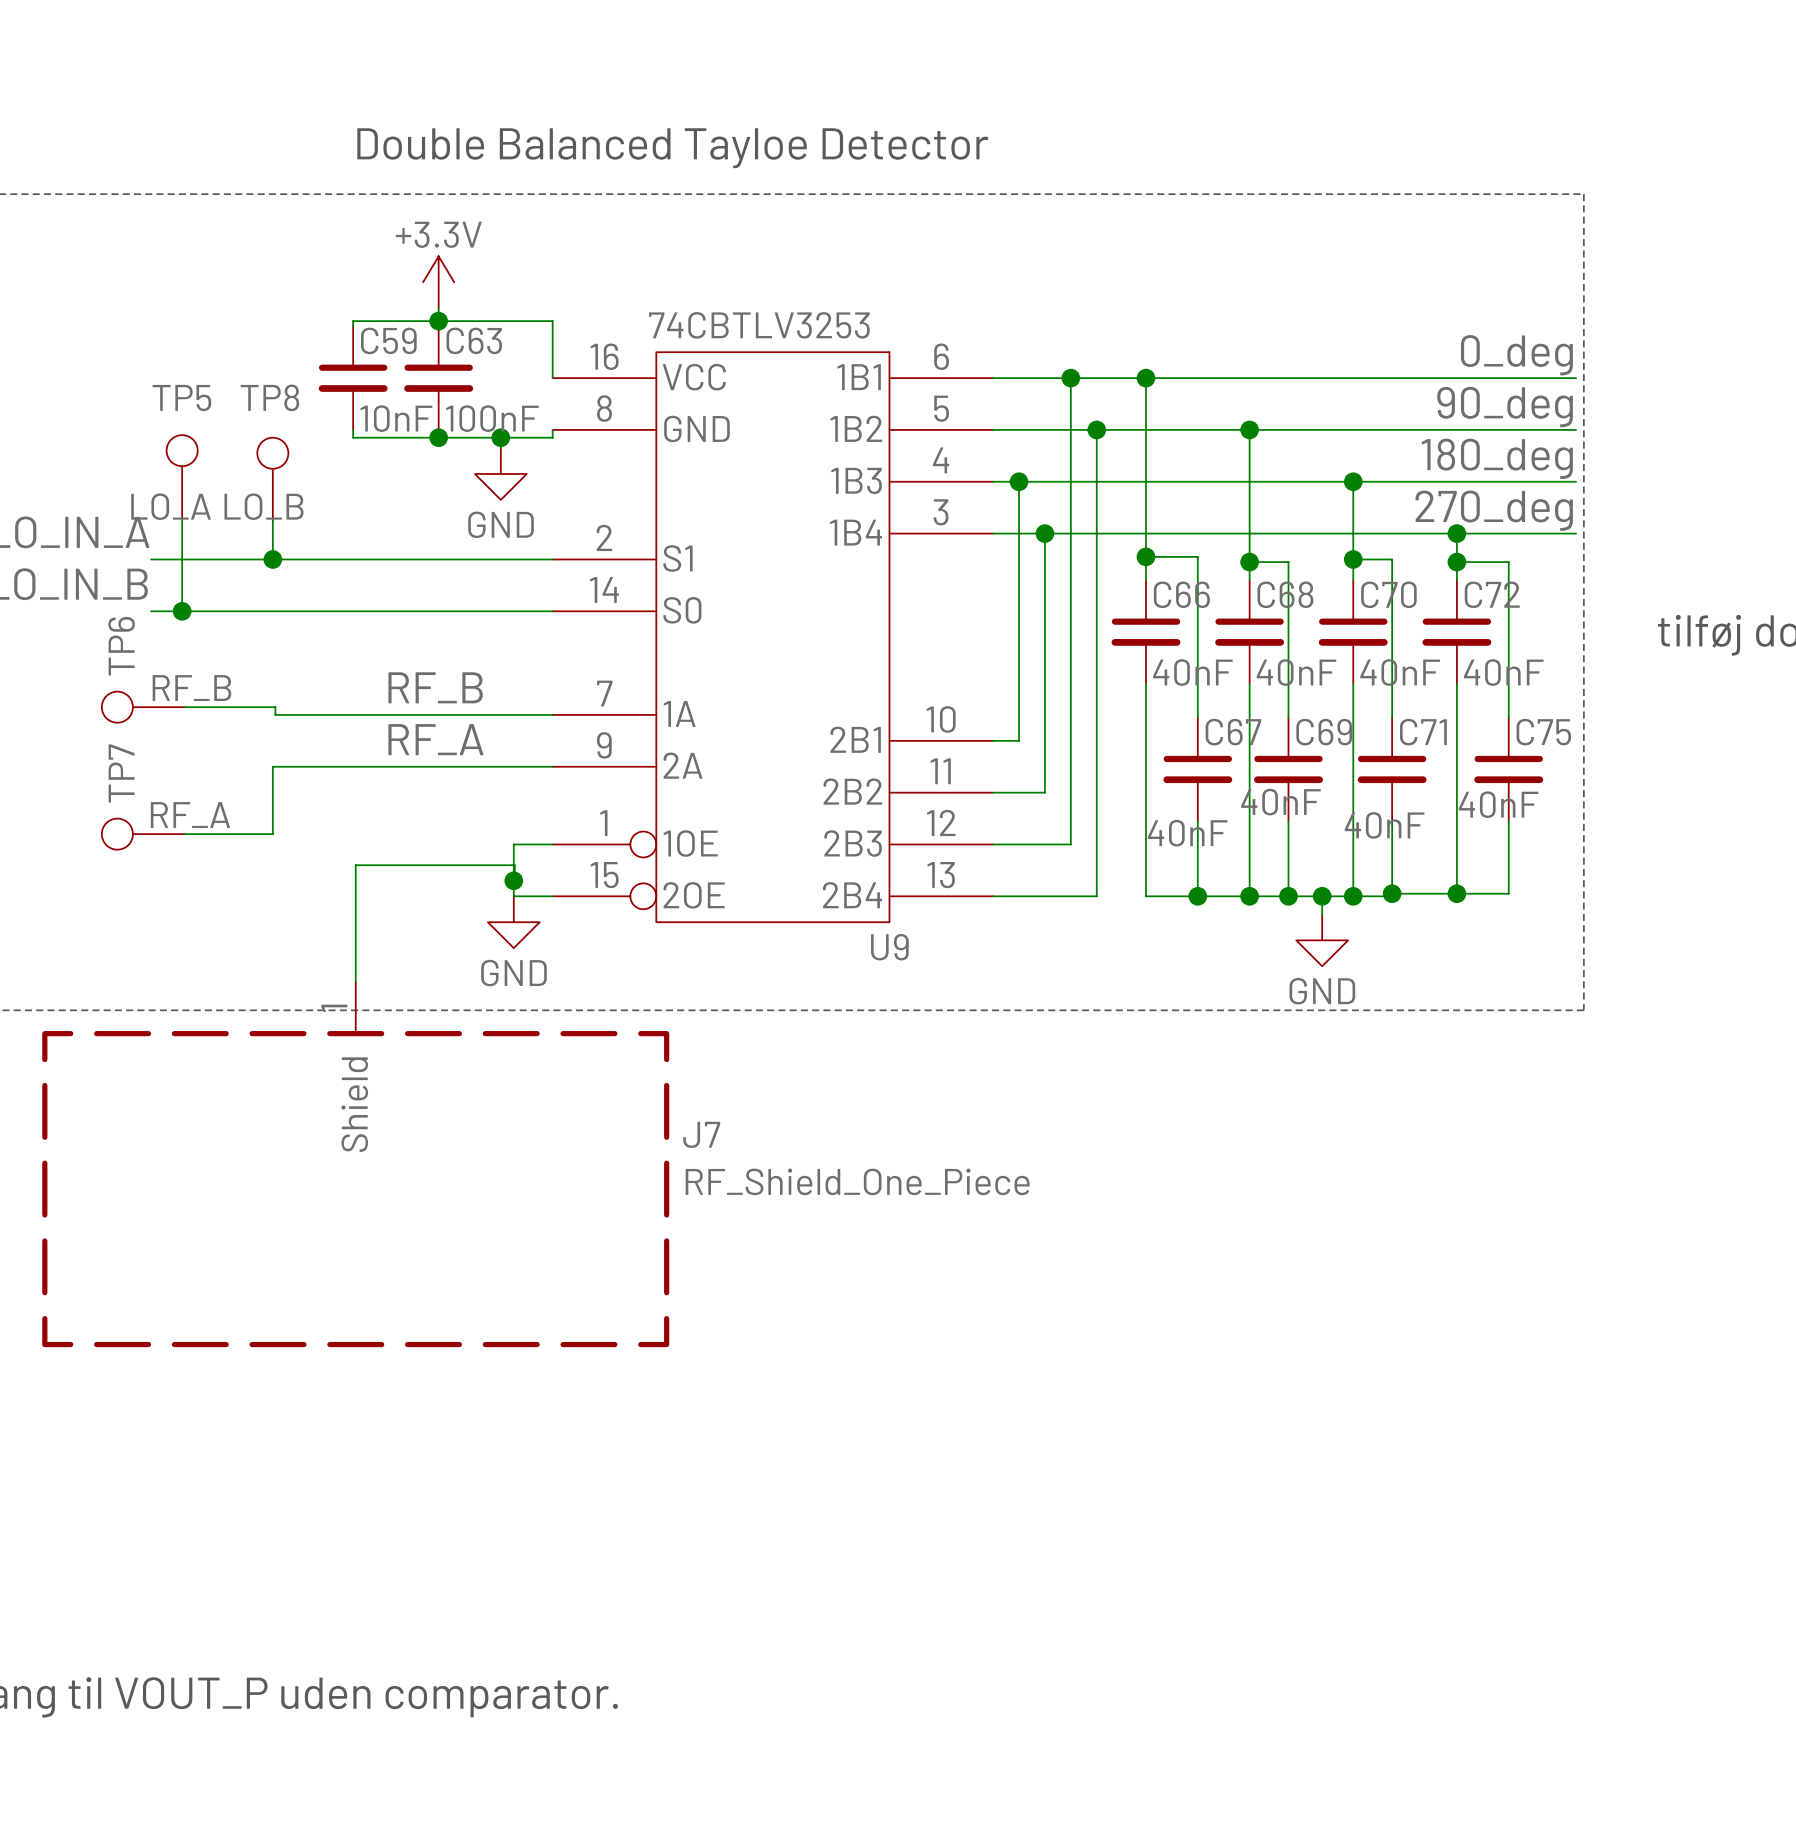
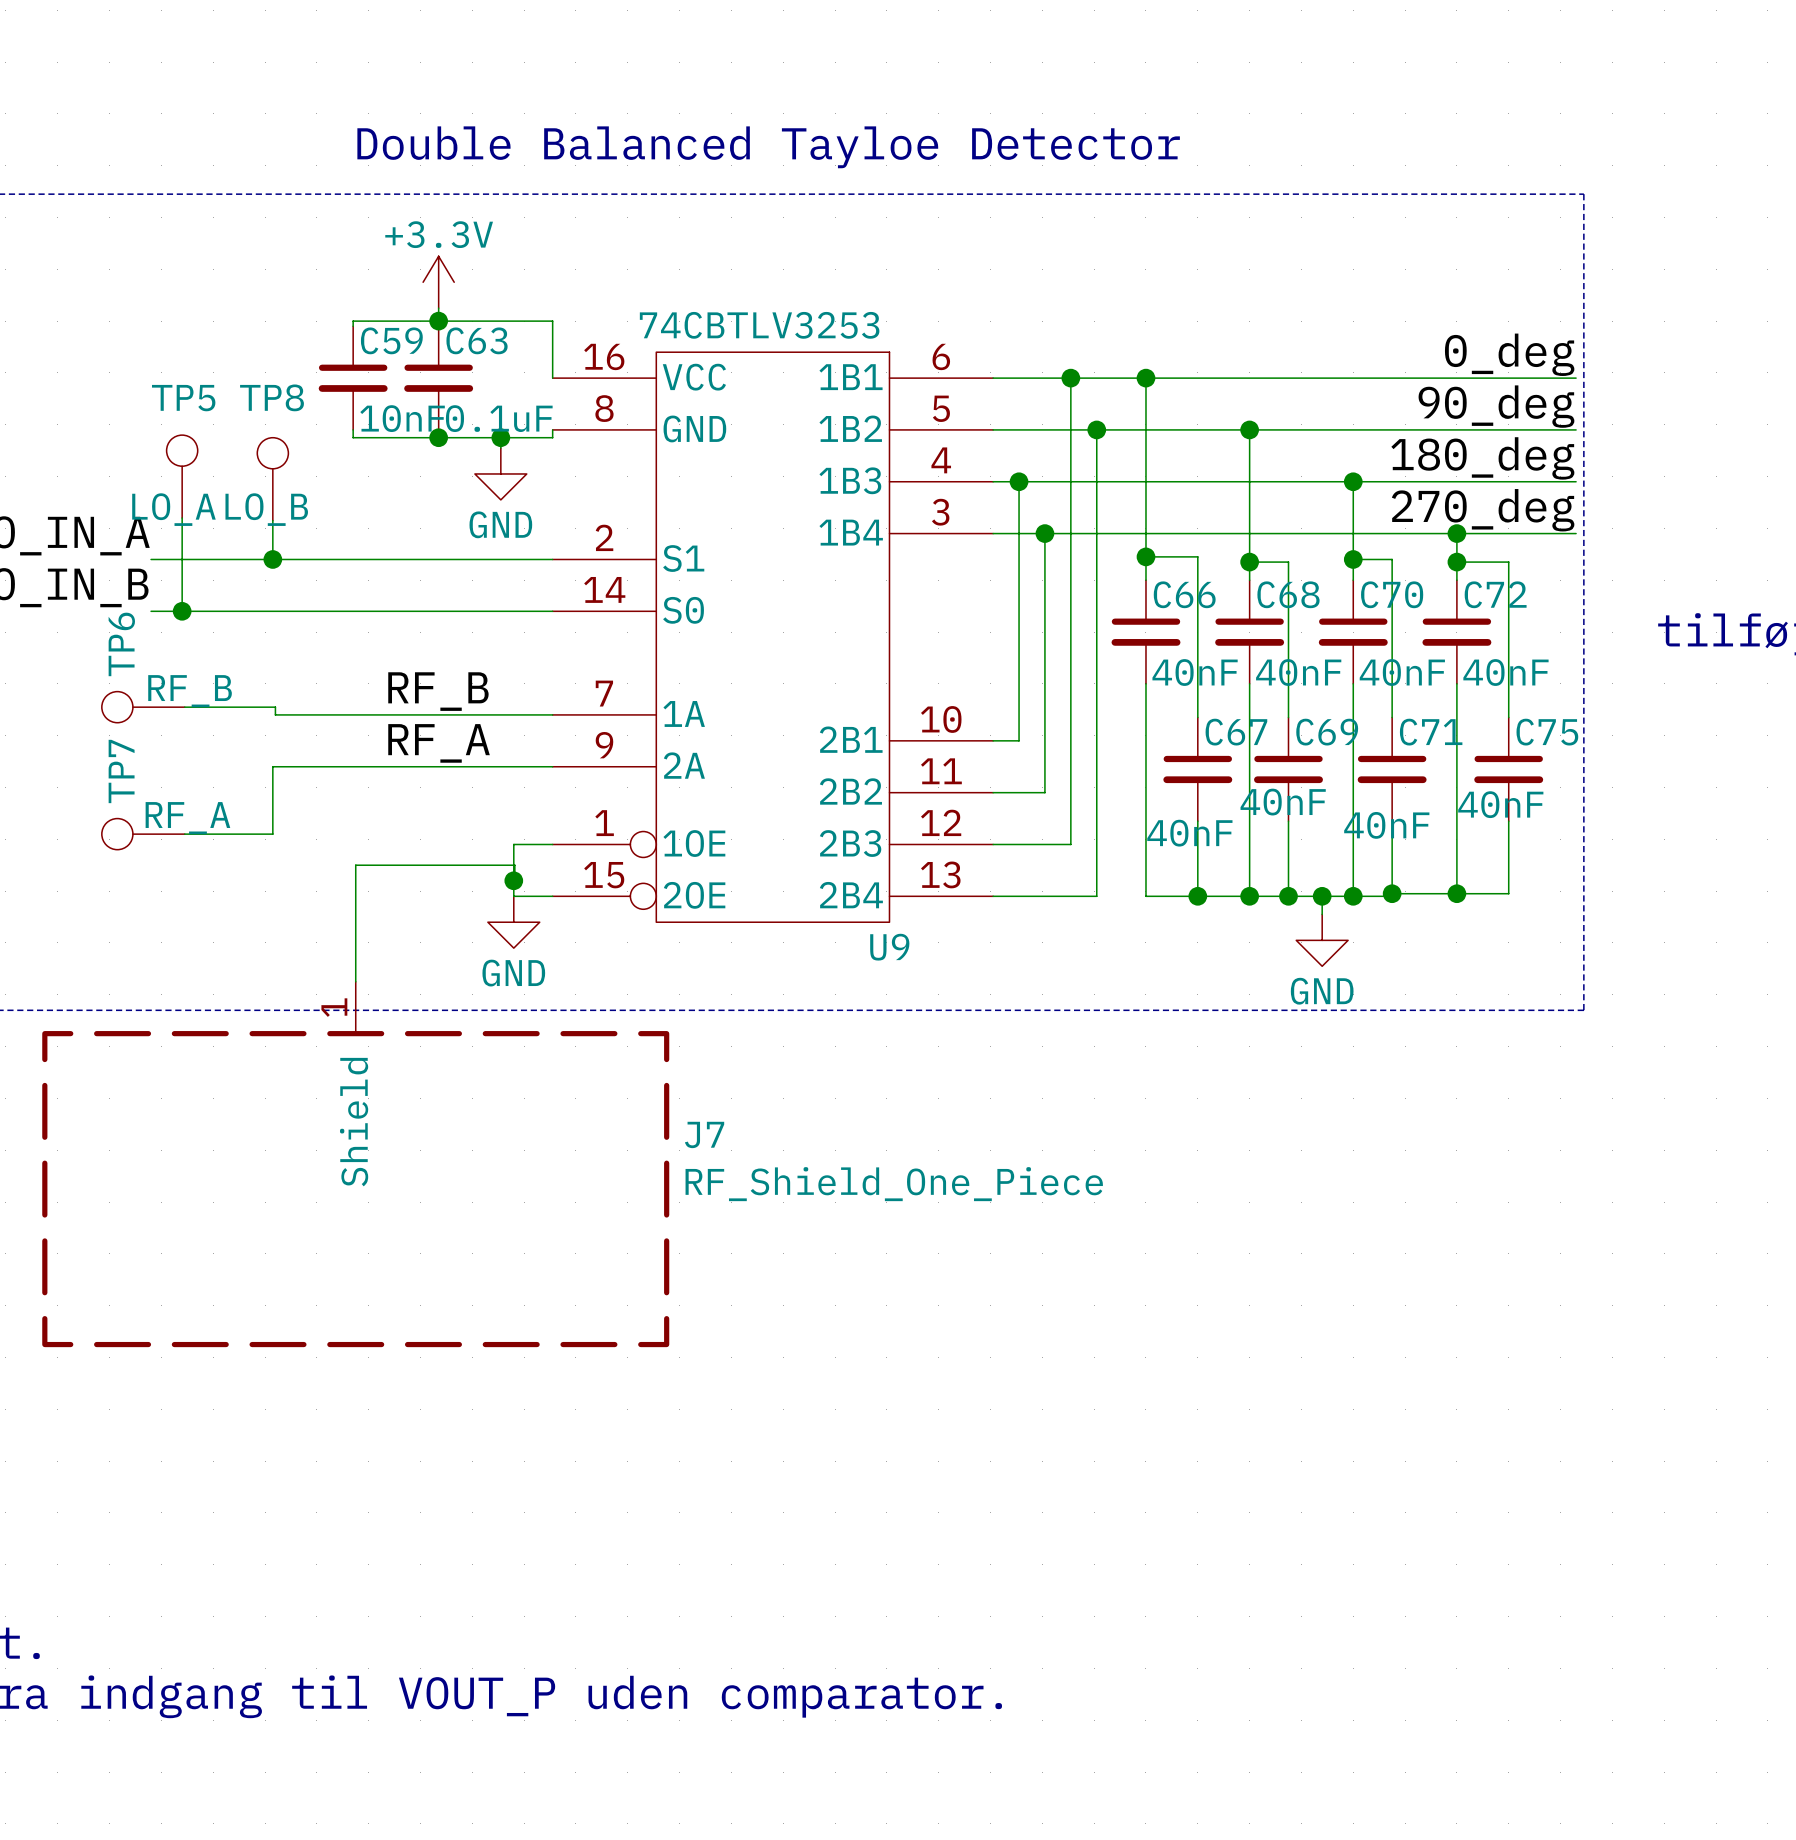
C63 value: 100nF (492, 418) -> 0.1uF (499, 418)

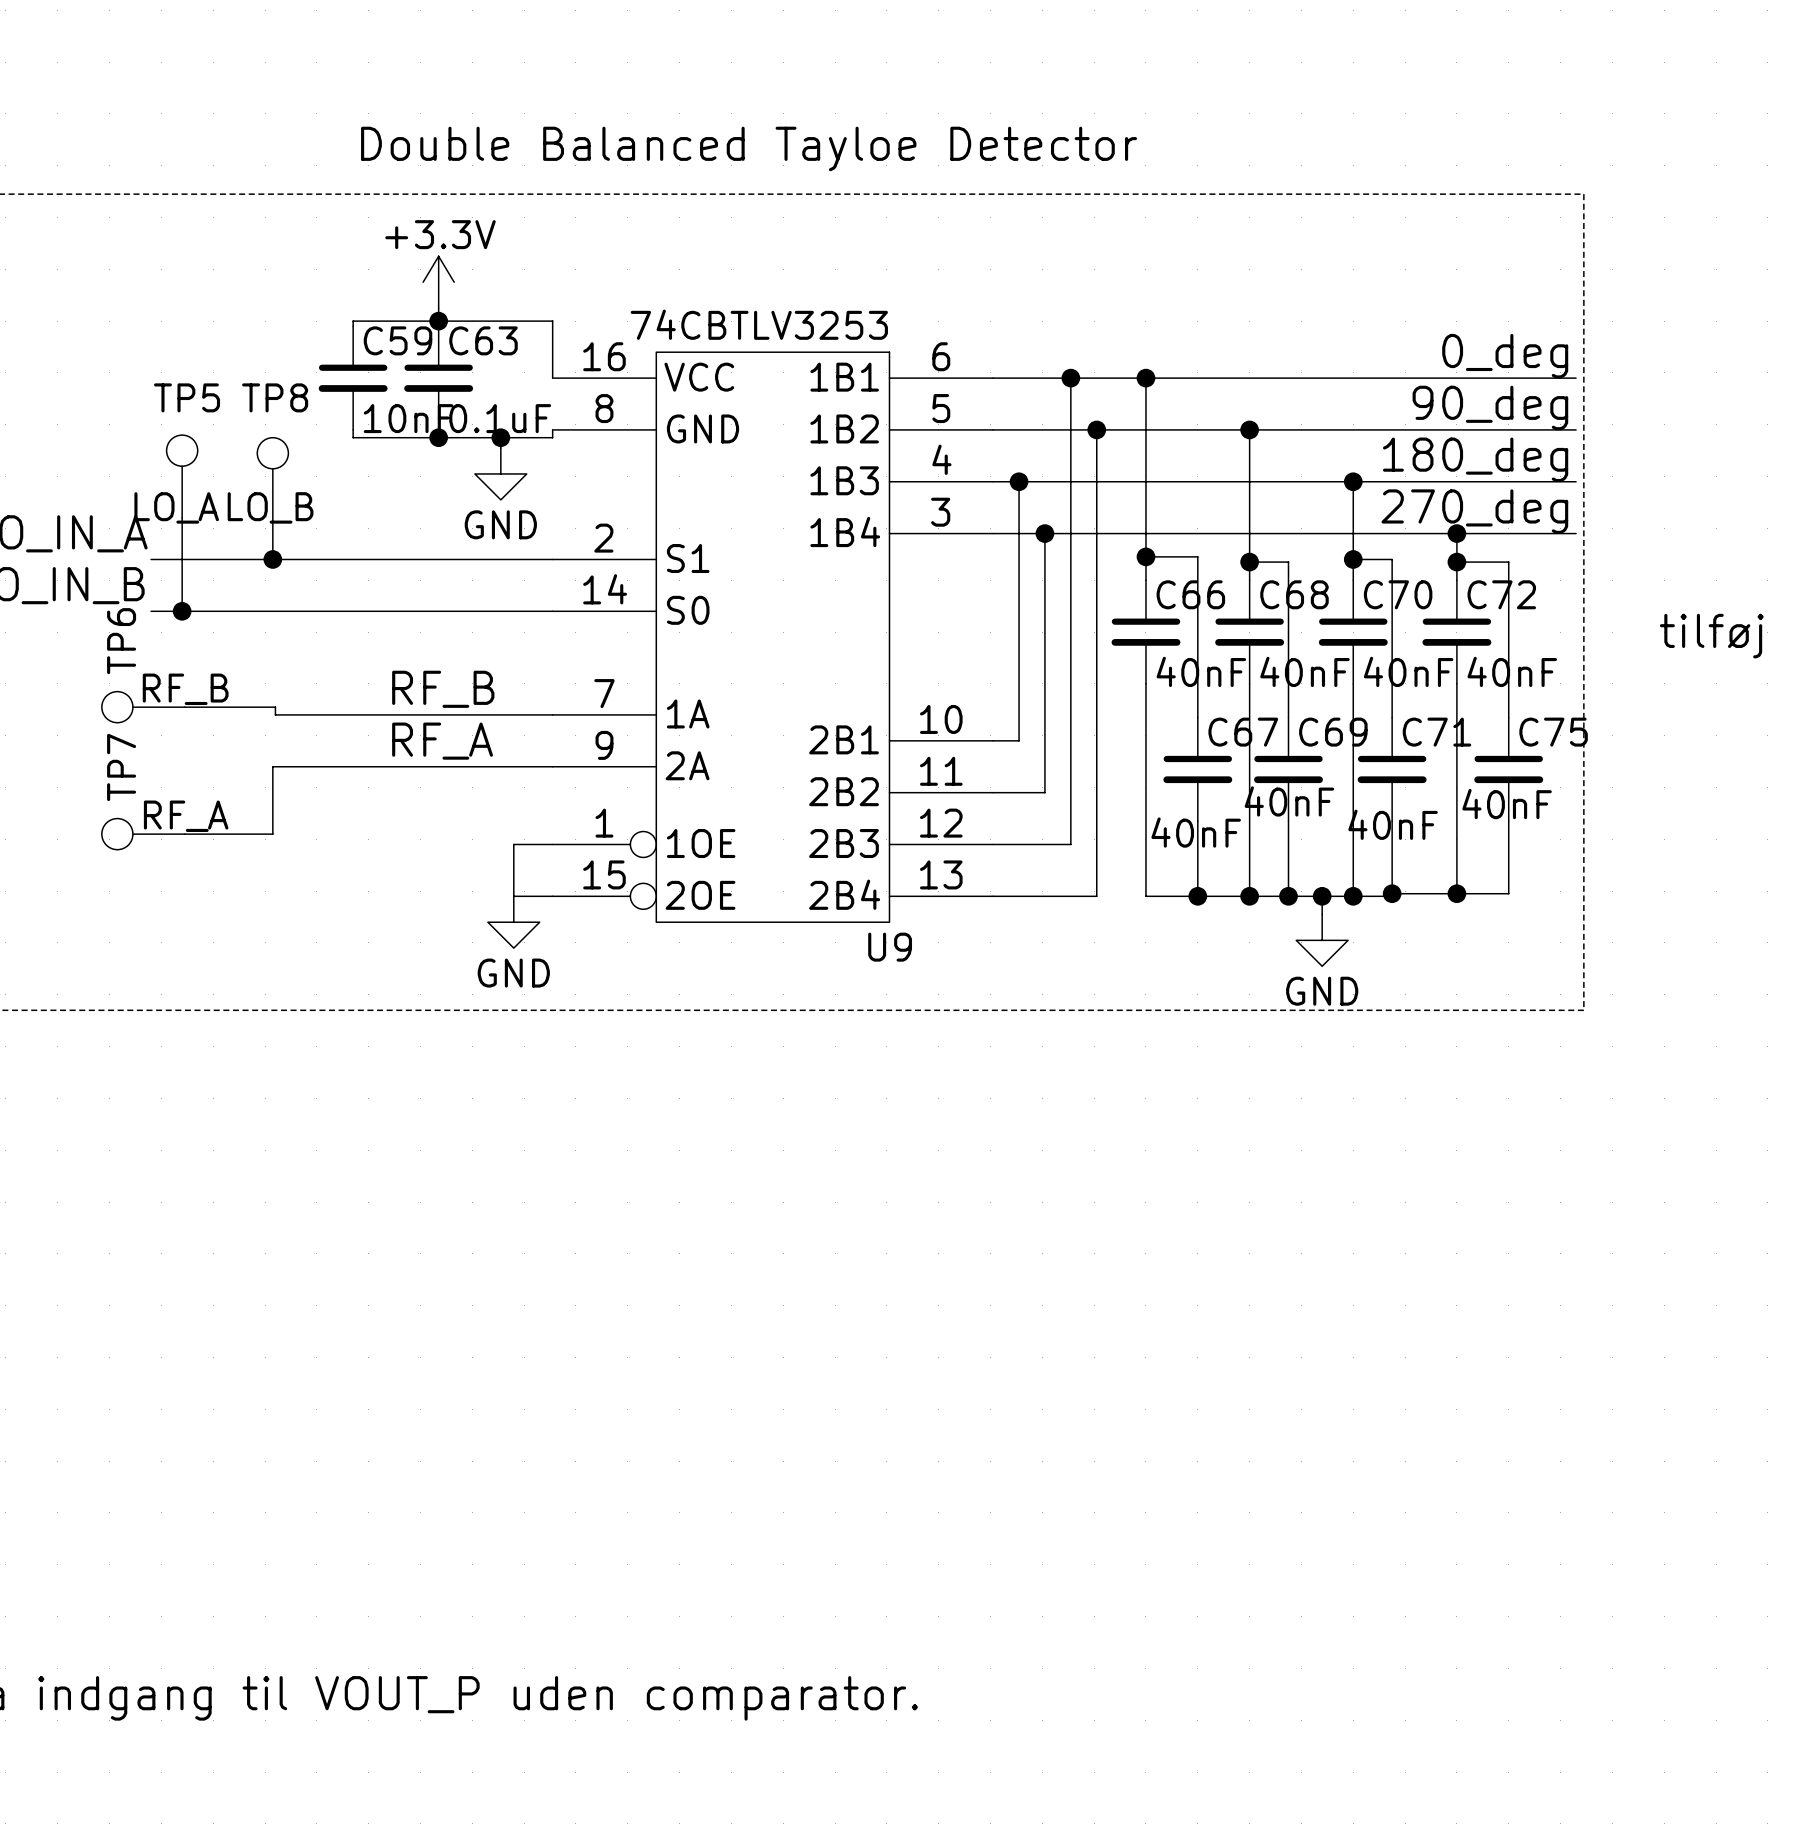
wire: (513, 880) (514, 865) (355, 865) (355, 981) -> none
junction: (513, 880) -> none
J7: RF_Shield_One_Piece (355, 1164) -> none

